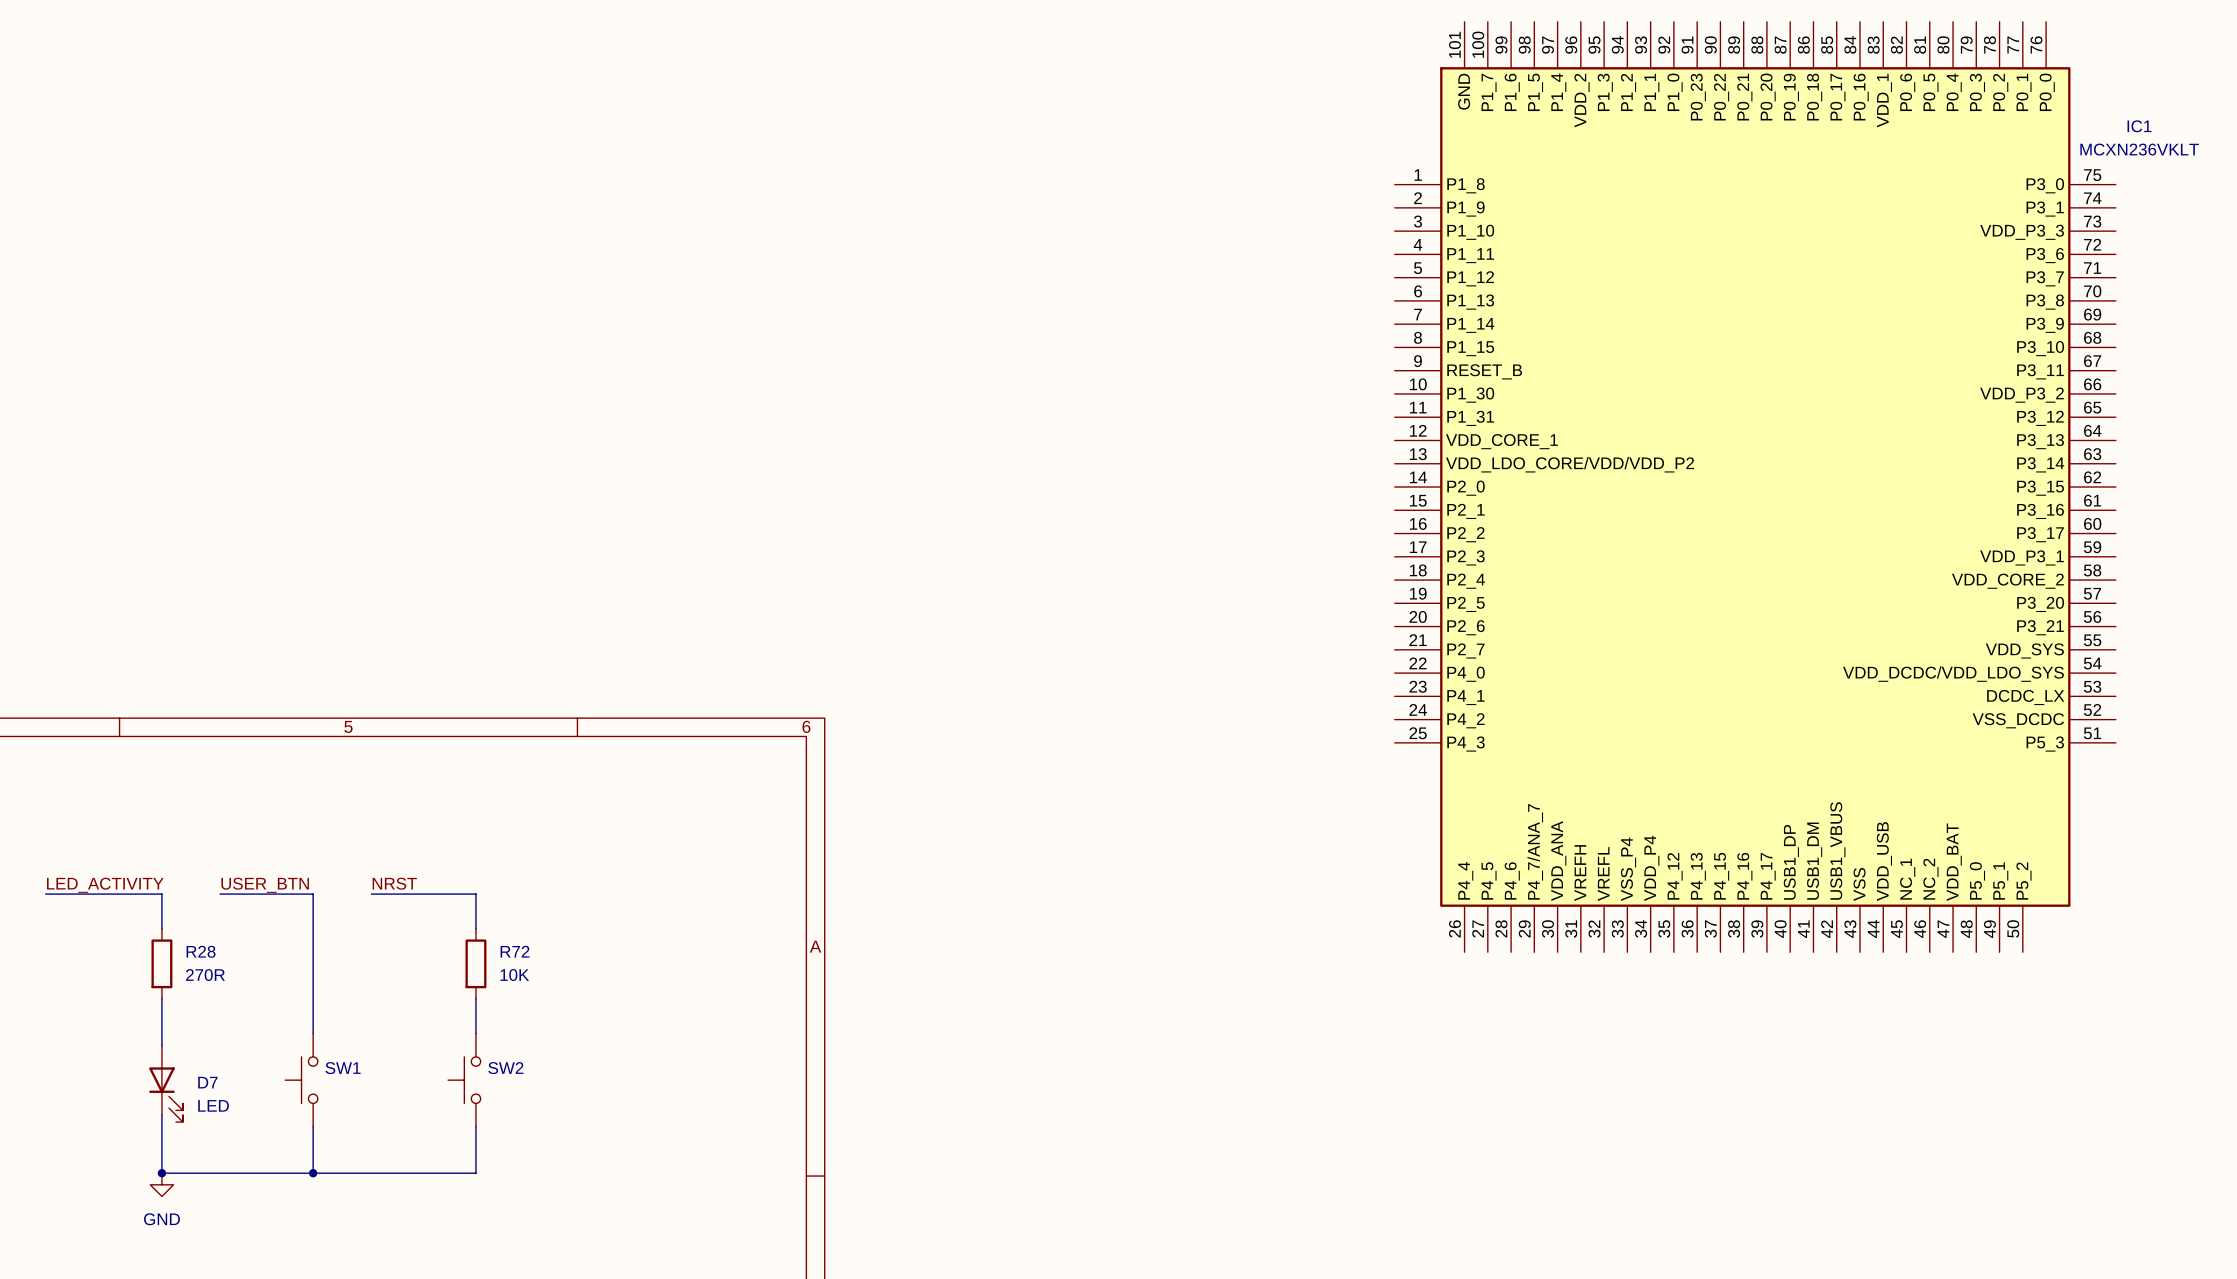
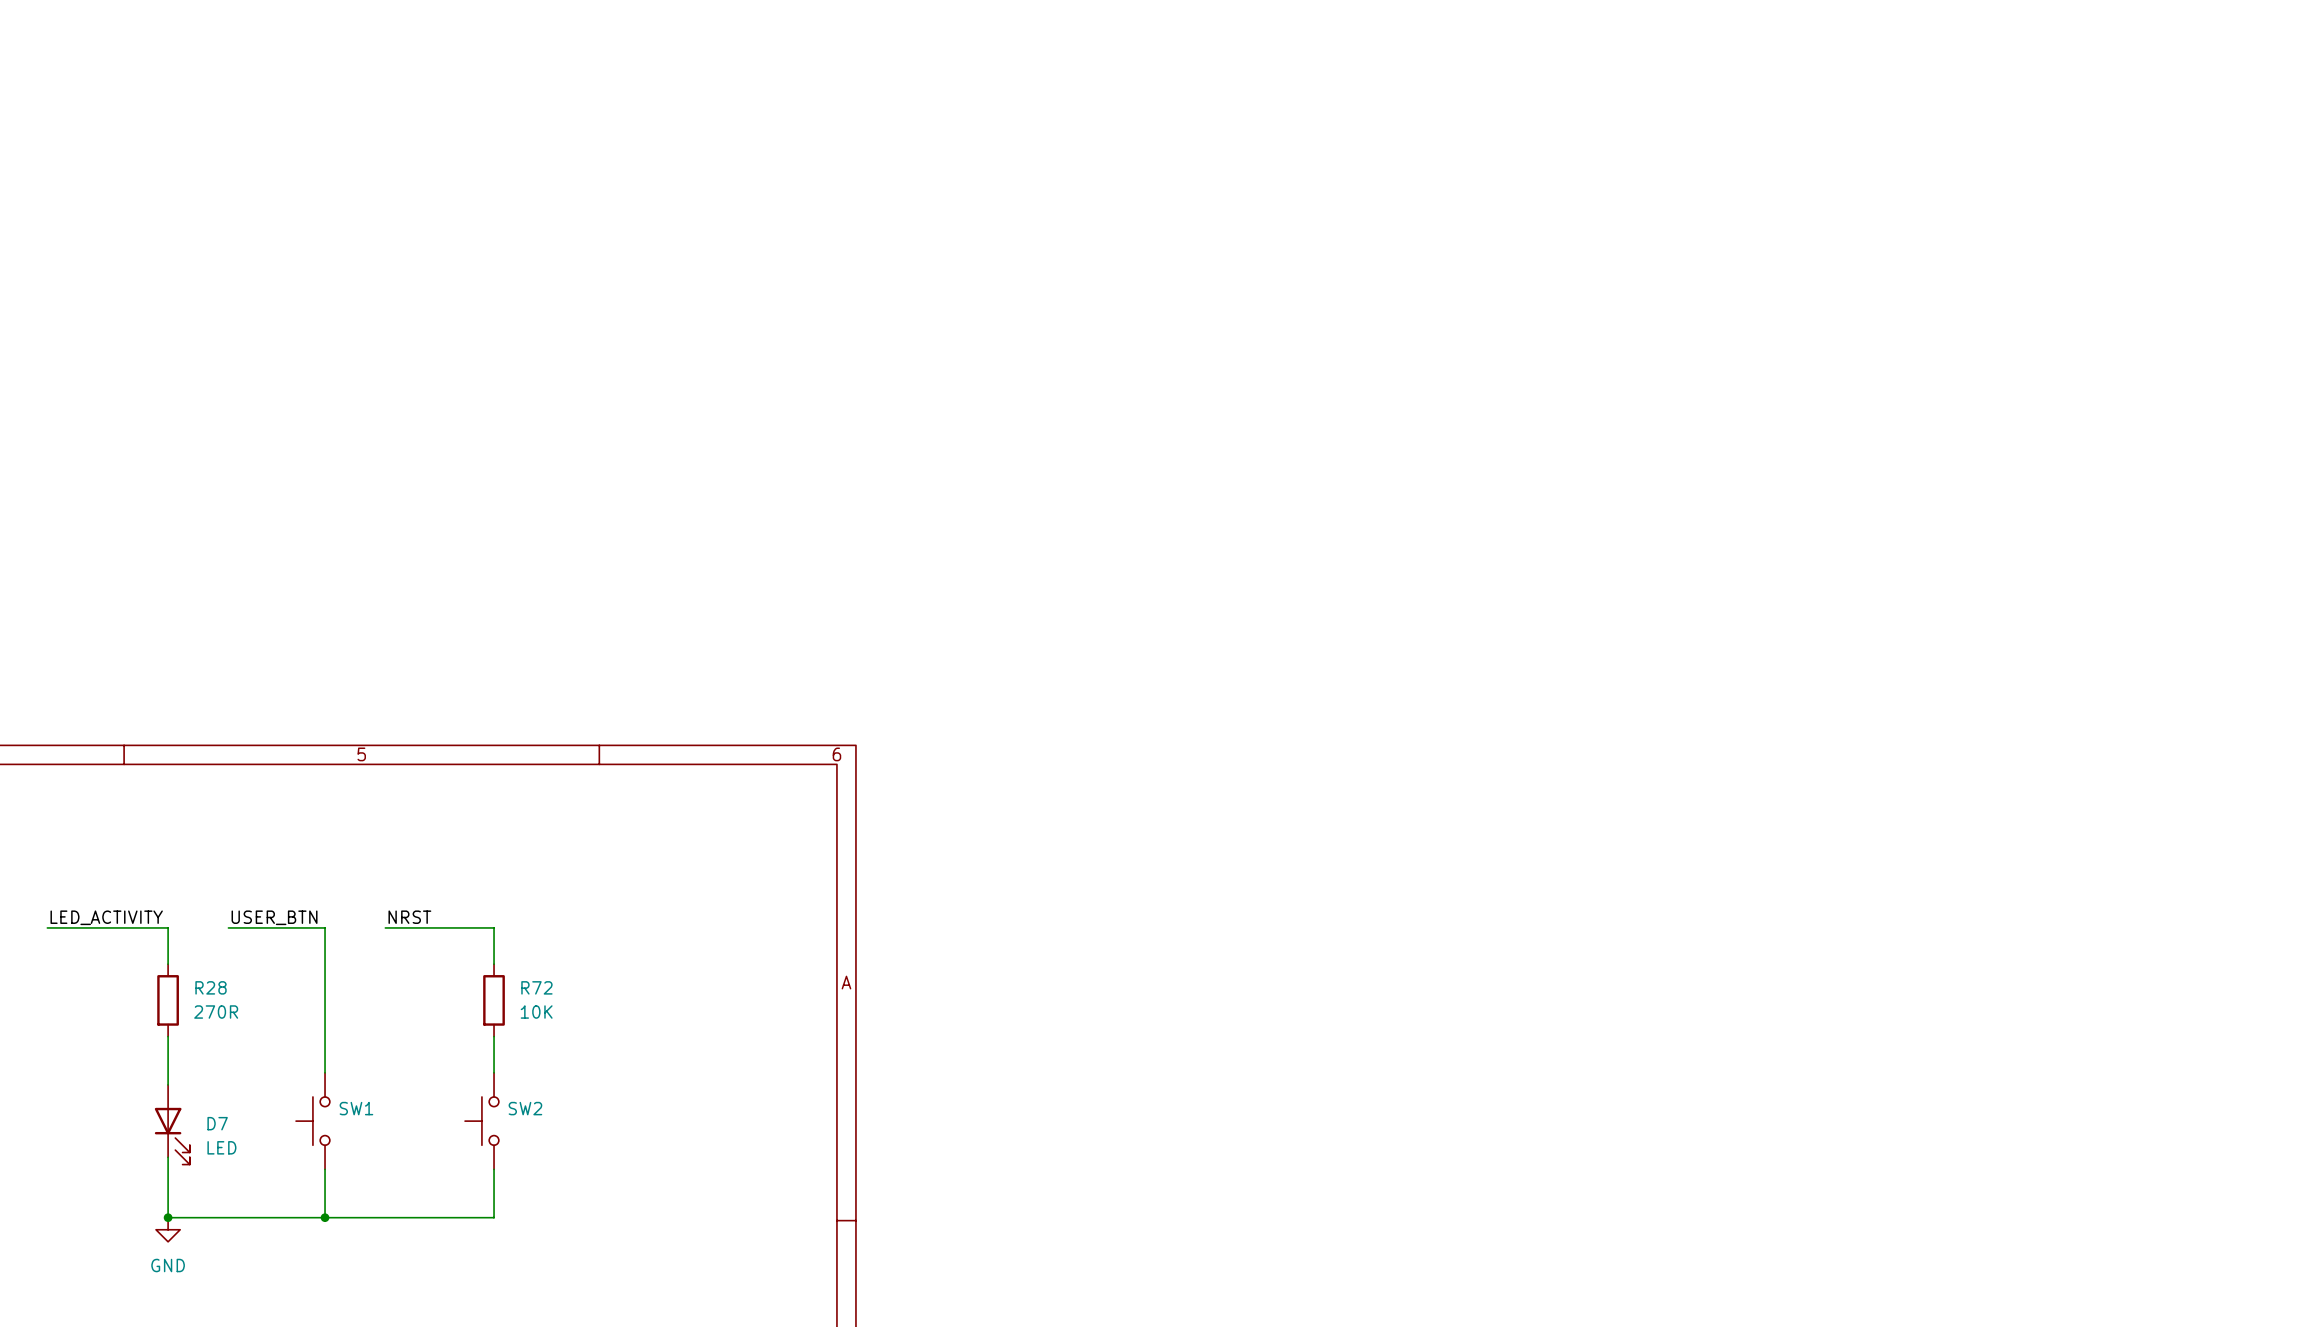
IC1: MCXN236VKLT (1755, 487) -> none

